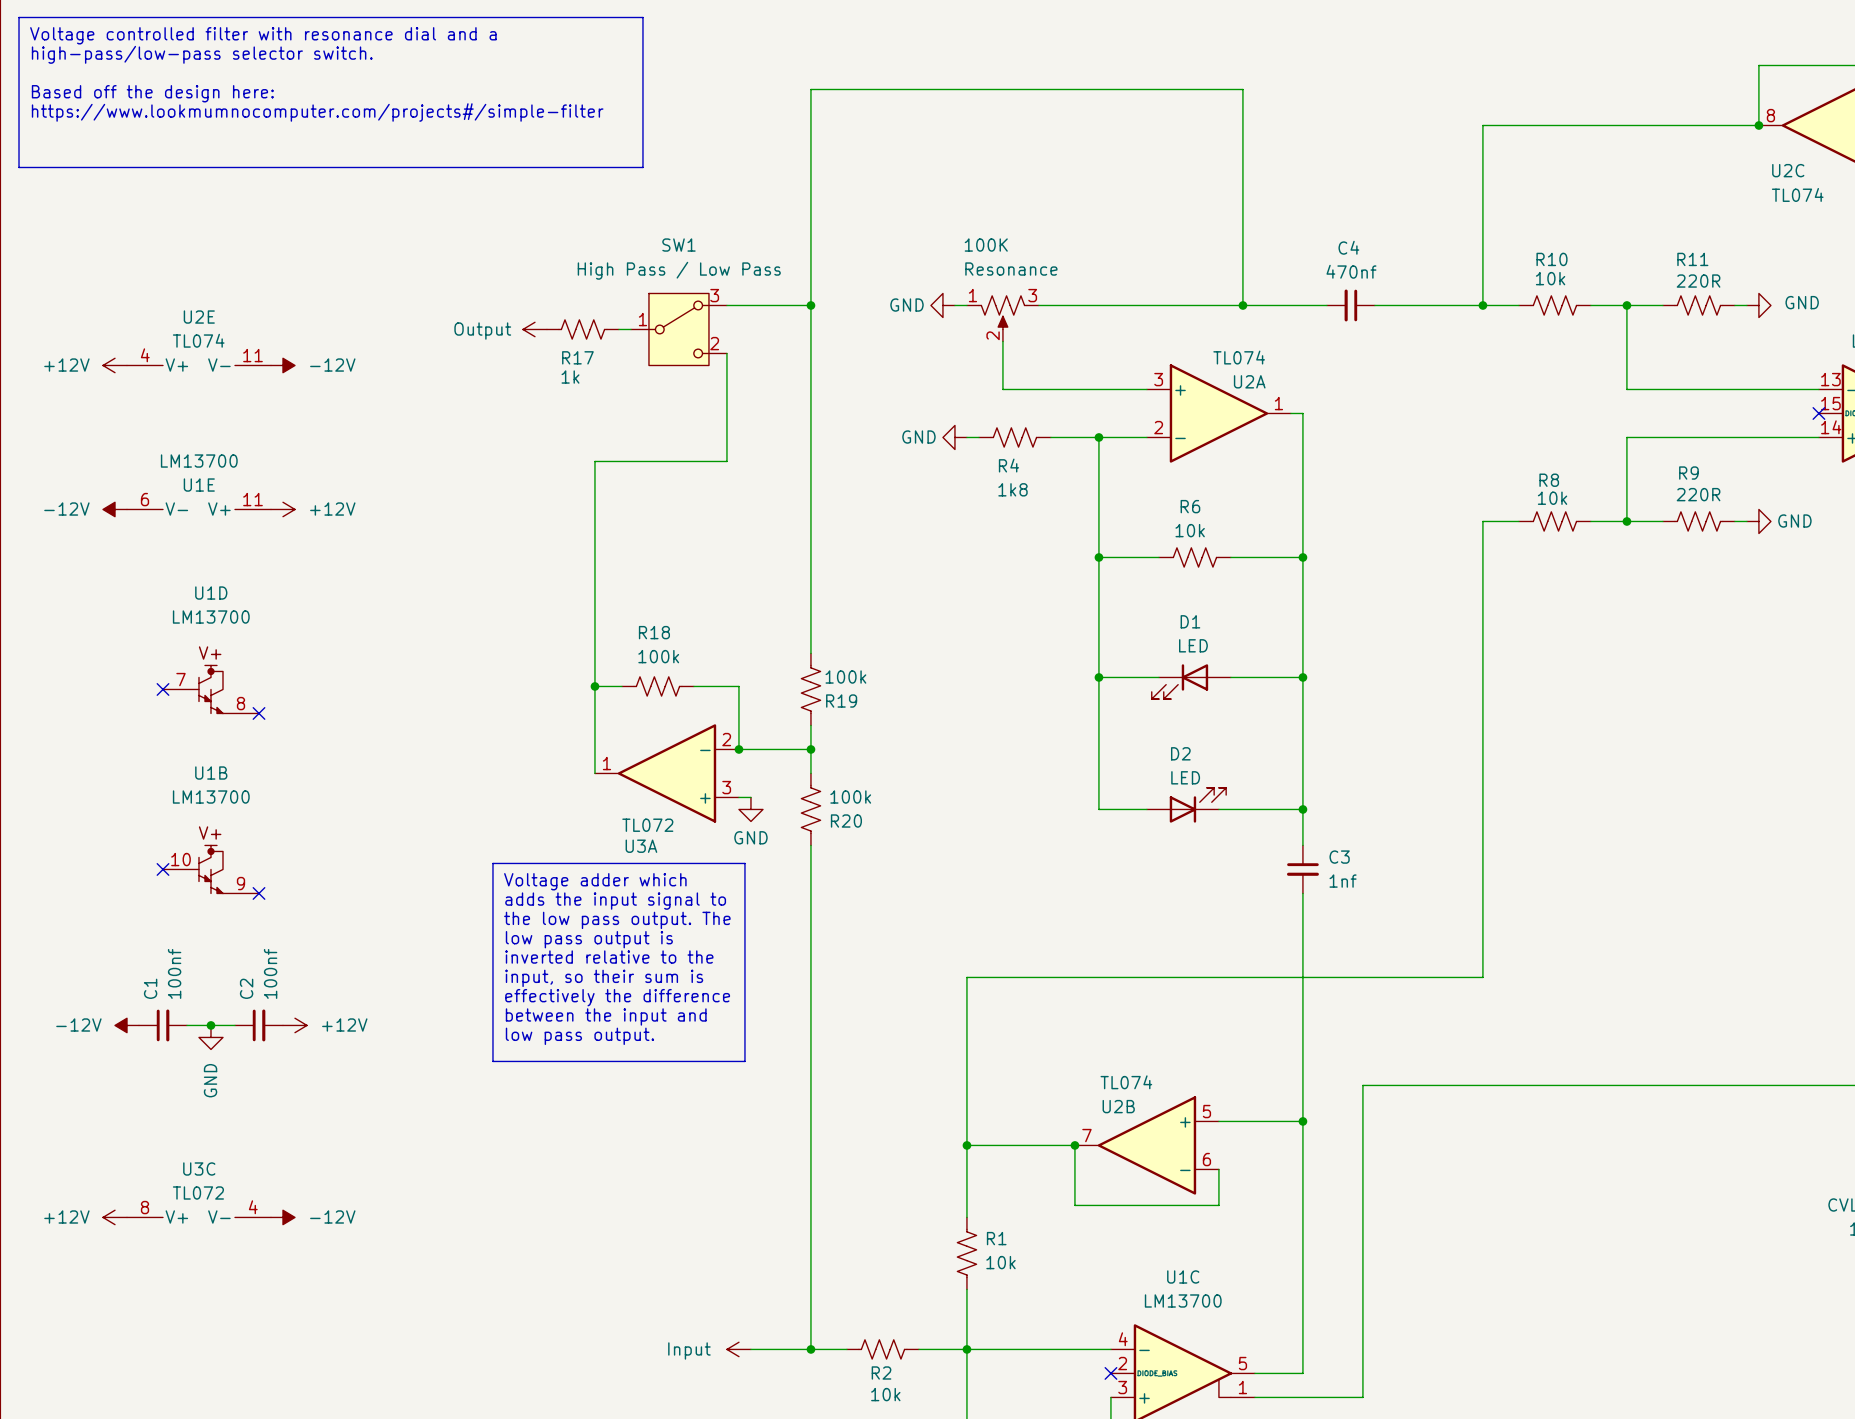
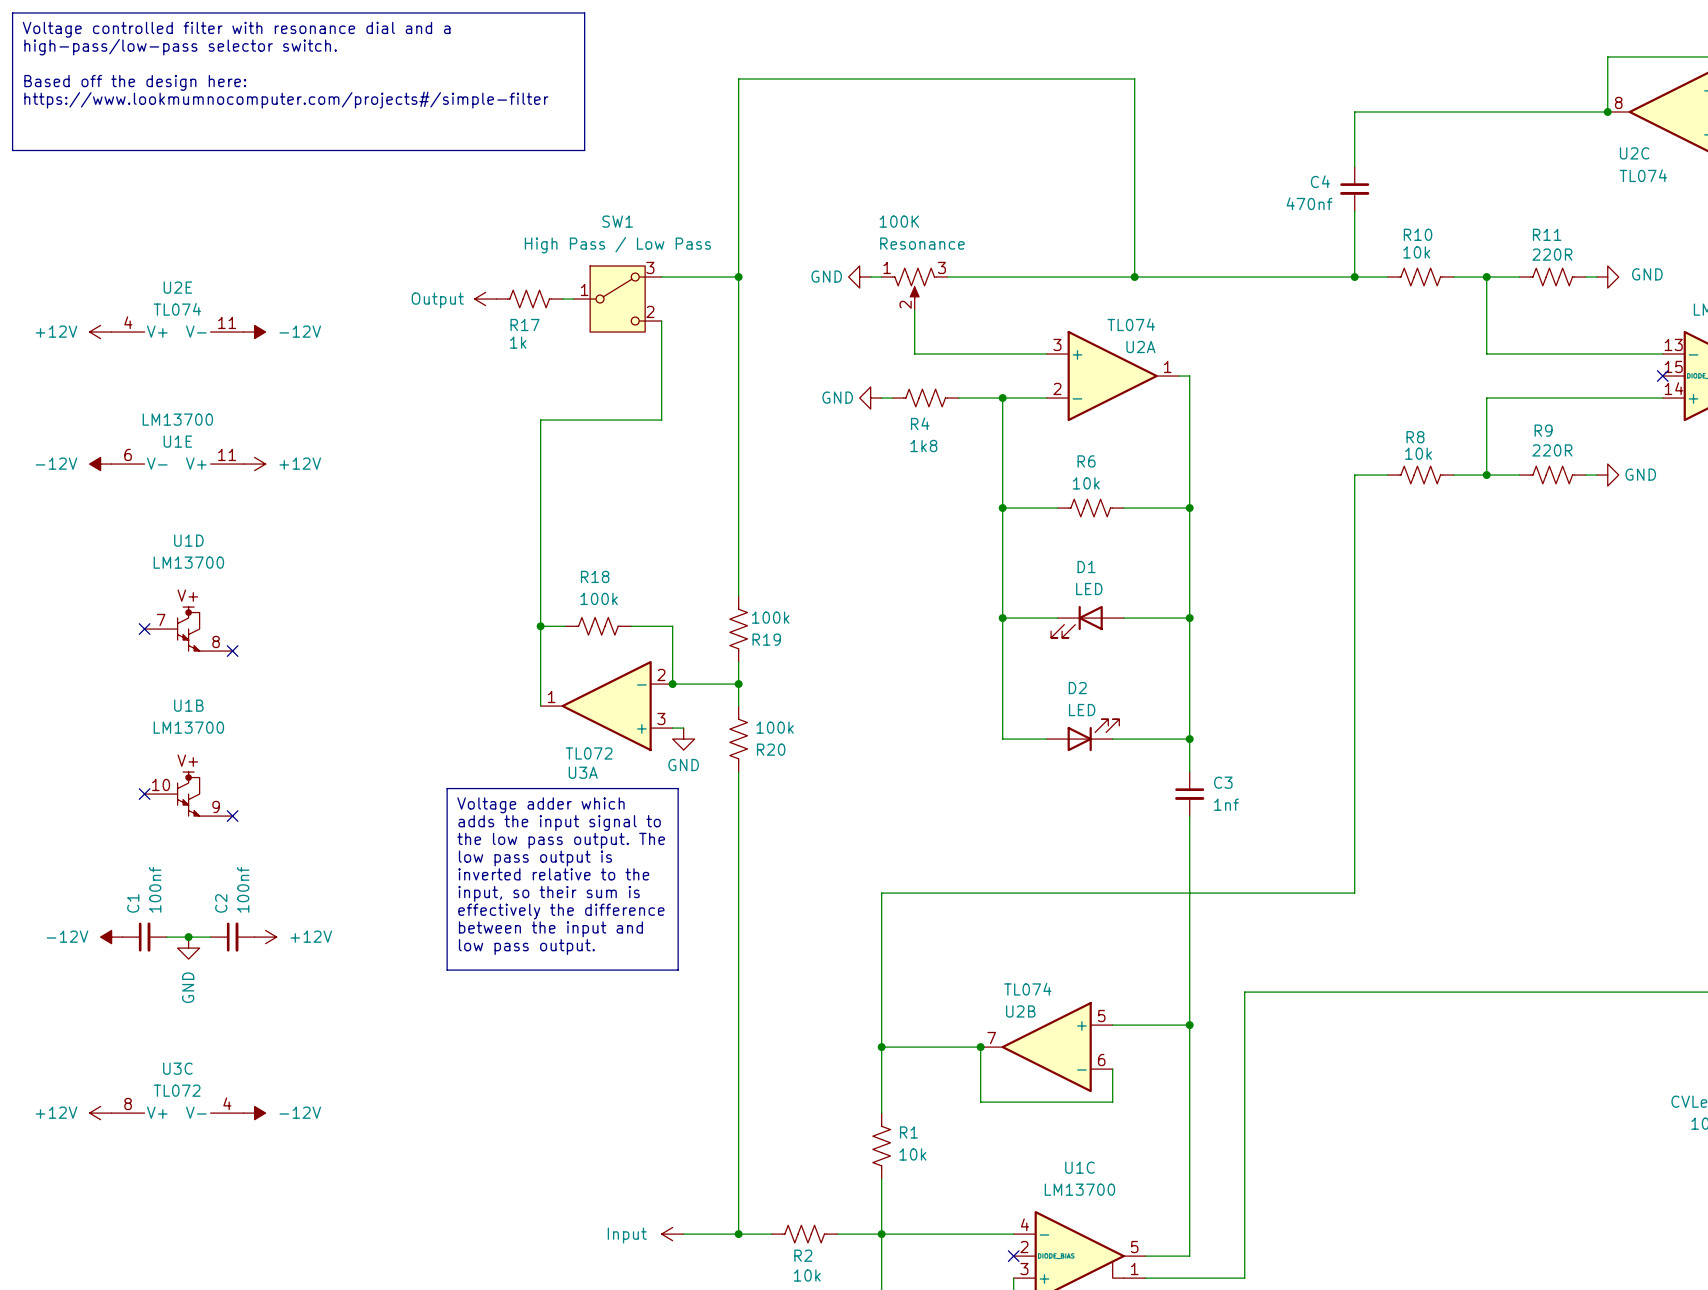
C4 name position: C4 (1348, 247) -> C4 (1320, 181)
C4 value position: 470nf (1351, 271) -> 470nf (1309, 203)
C4 rotation: 0° (1350, 305) -> 90° counterclockwise (1354, 189)
C4 position: (1350, 305) -> (1354, 189)

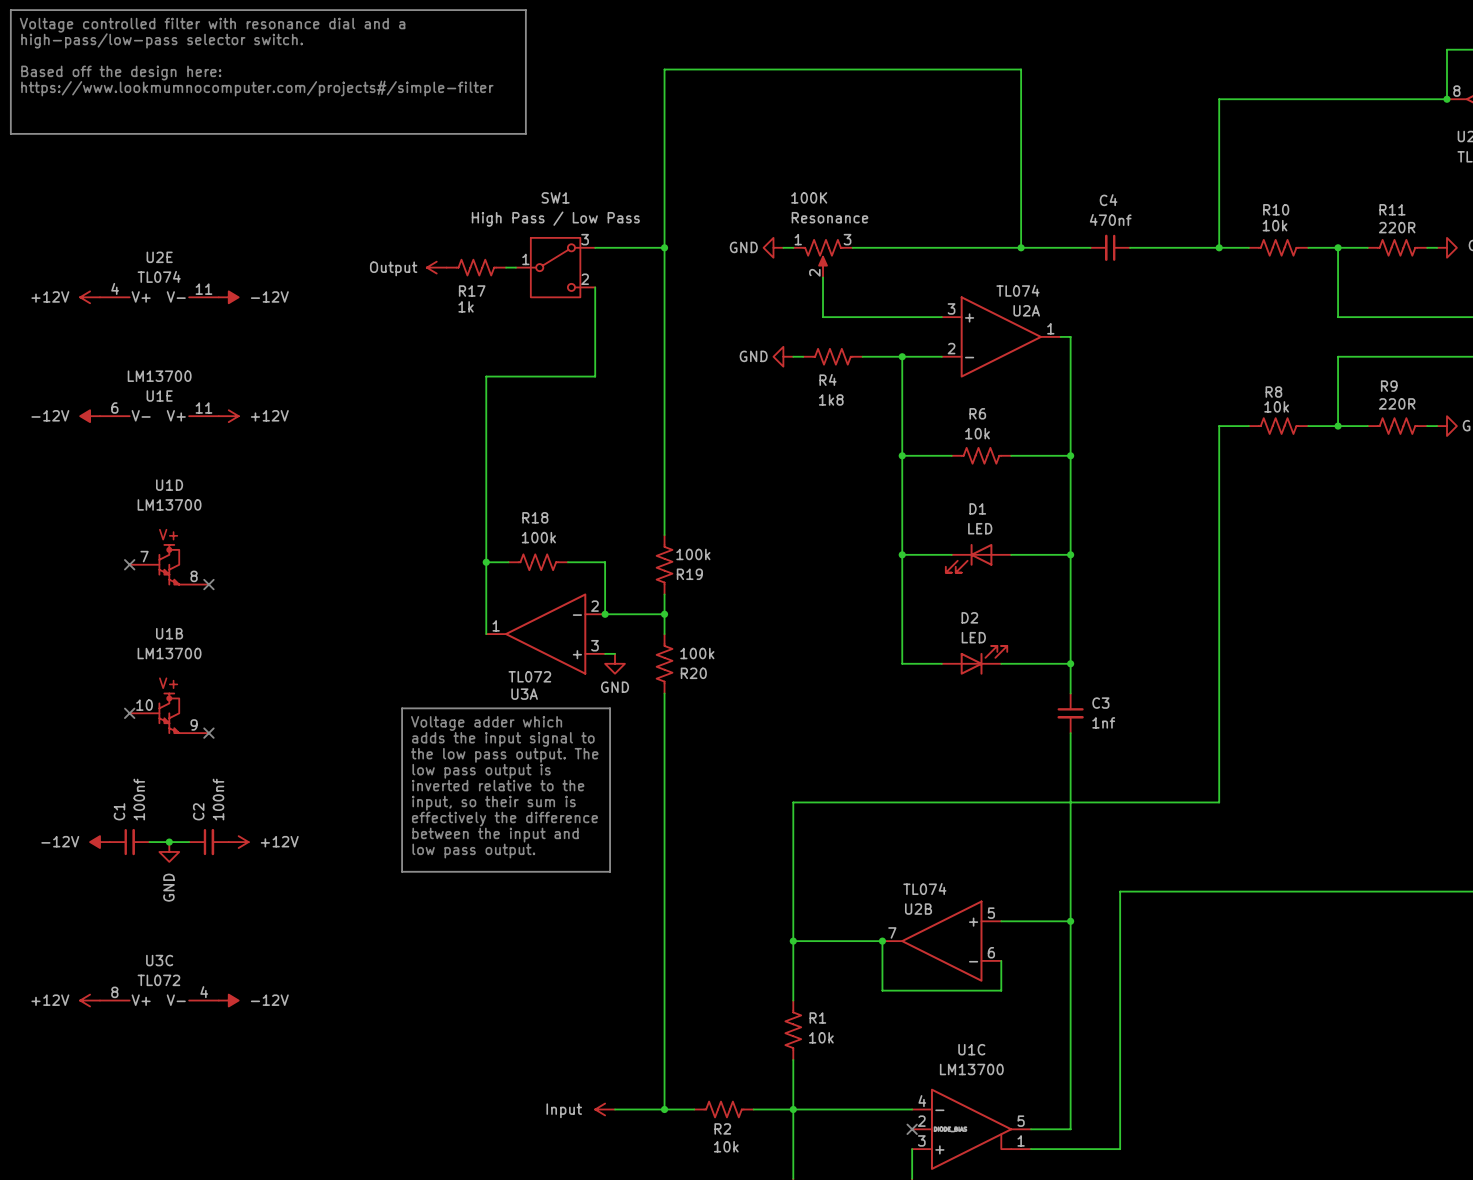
C4 name position: C4 (1320, 181) -> C4 (1108, 200)
C4 rotation: 0° (1354, 189) -> 90° clockwise (1110, 247)
C4 position: (1354, 189) -> (1110, 247)
C4 value position: 470nf (1309, 203) -> 470nf (1110, 219)

